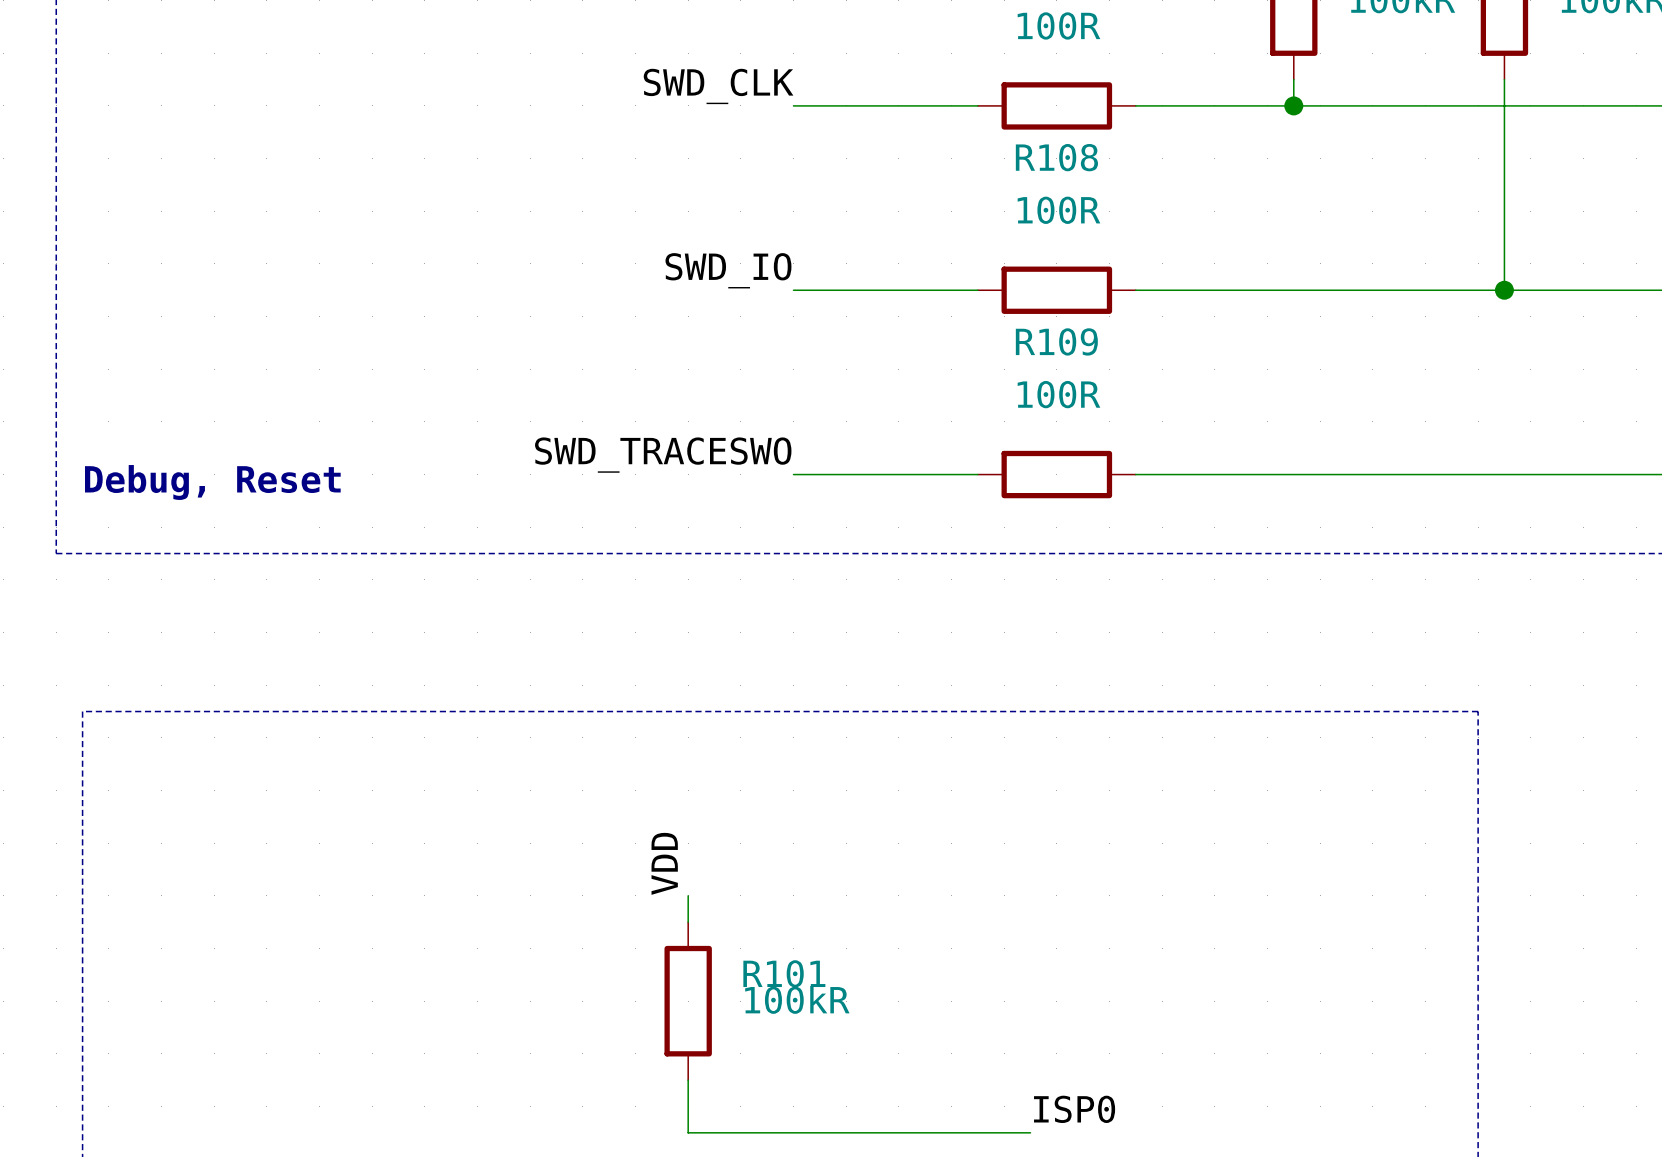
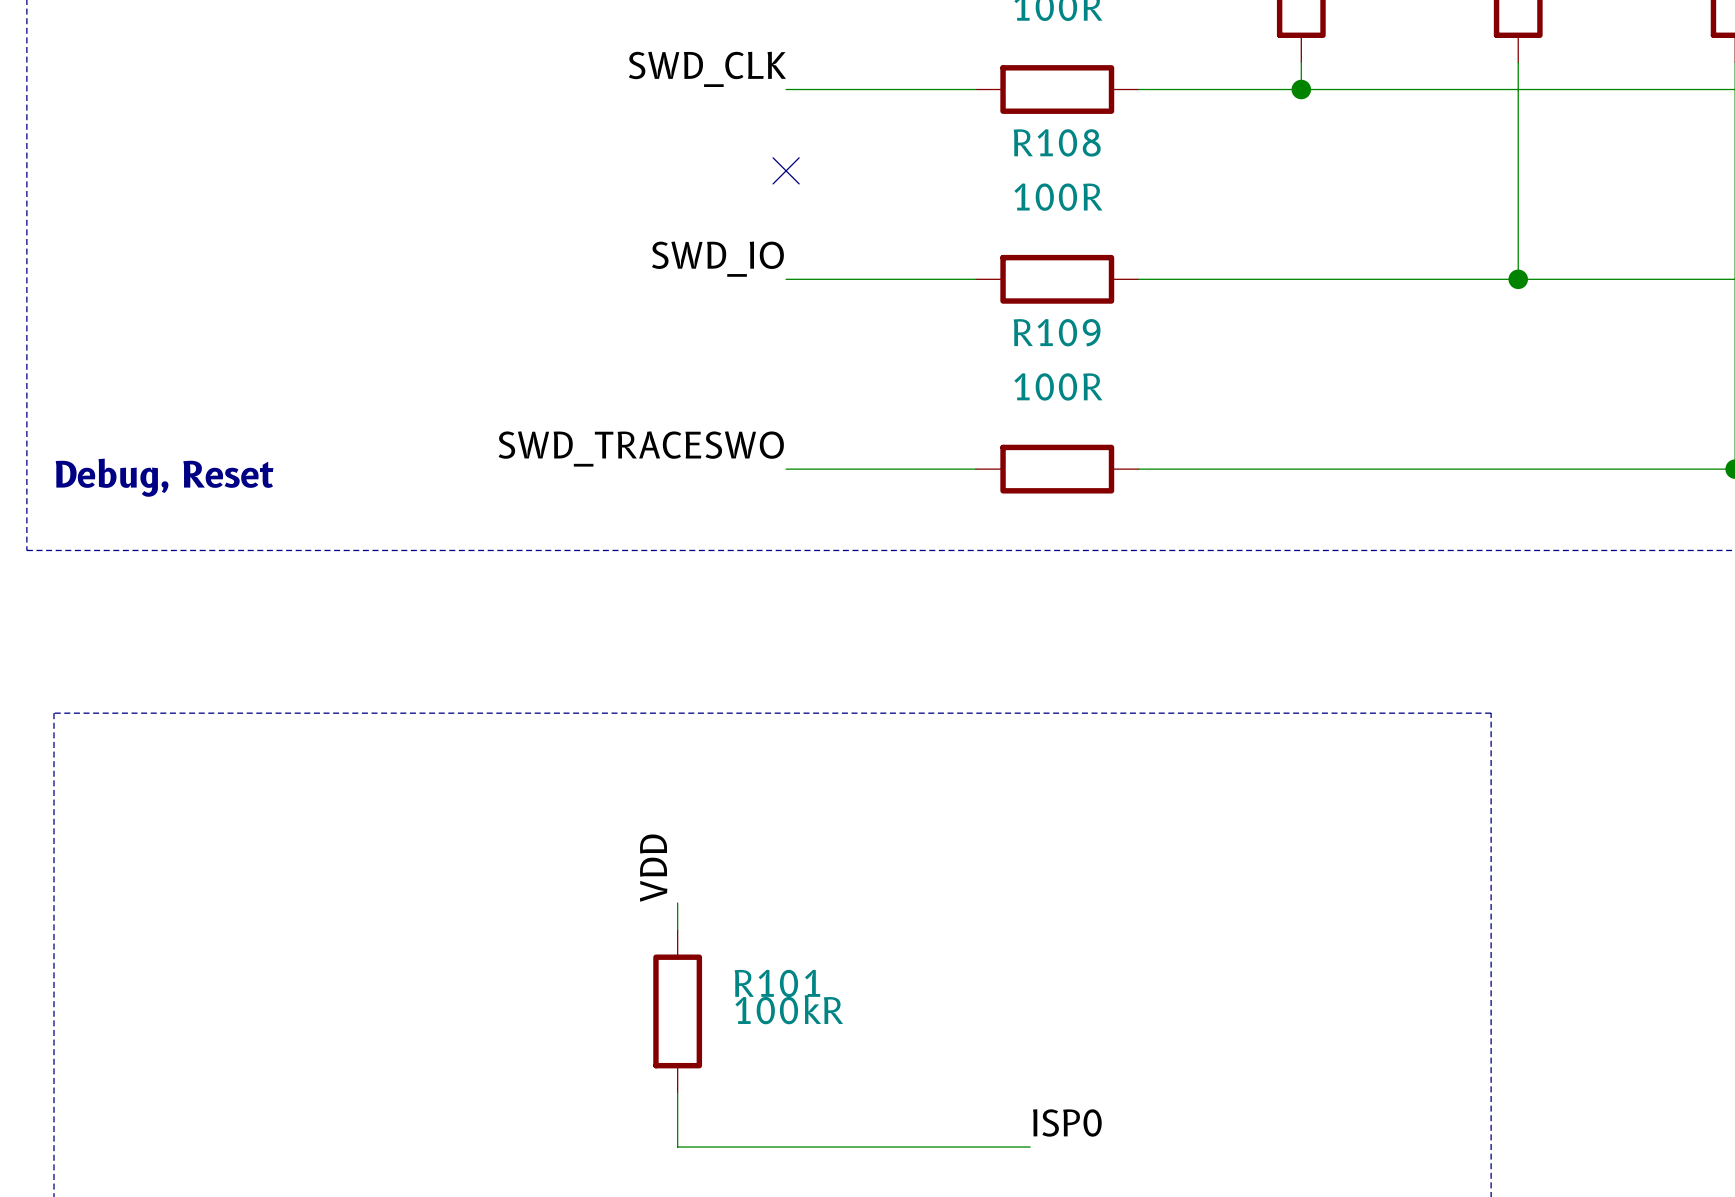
no-connect mark: none -> (786, 170)

